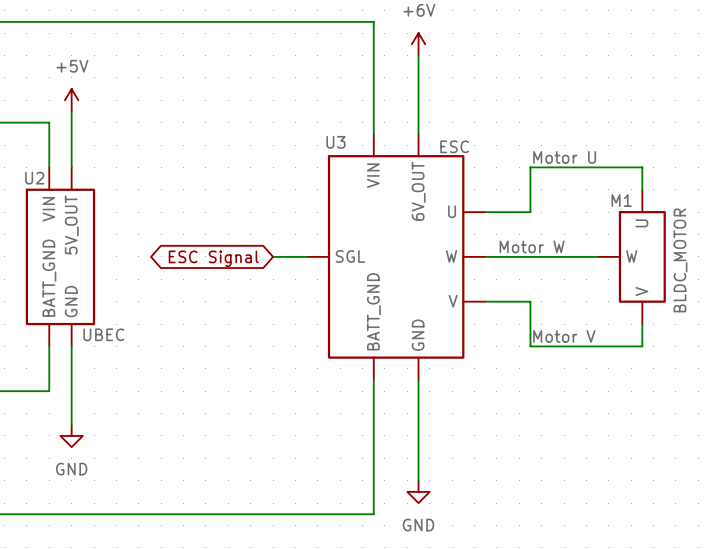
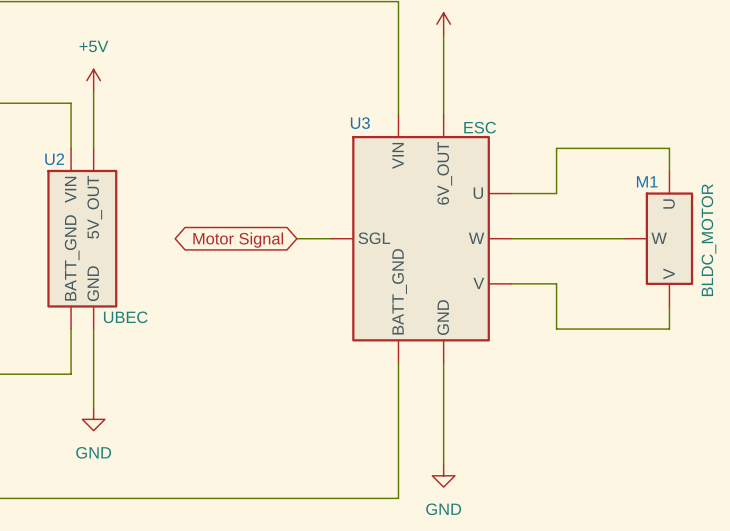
label: Motor U (564, 157) -> none
label: Motor W (532, 246) -> none
global label: ESC Signal (213, 258) -> Motor Signal (238, 240)
label: Motor V (564, 336) -> none

